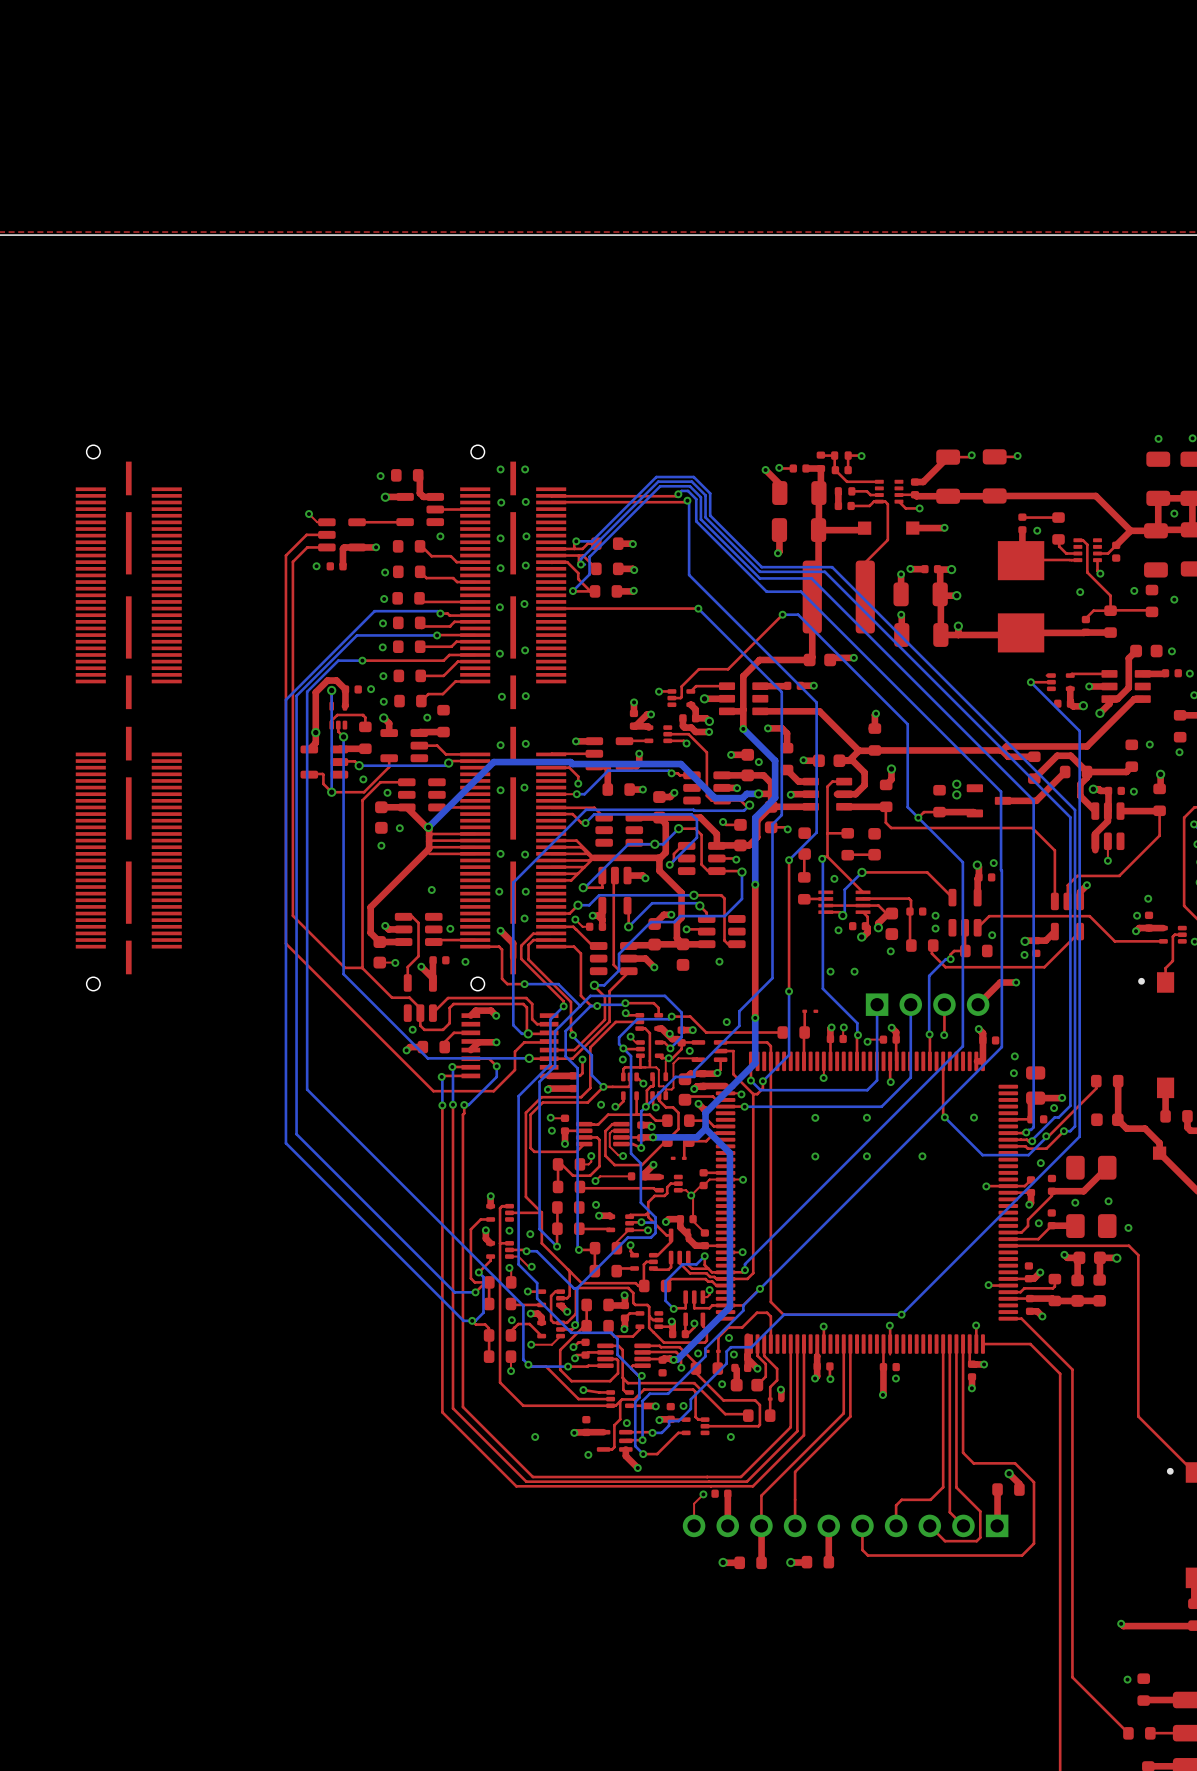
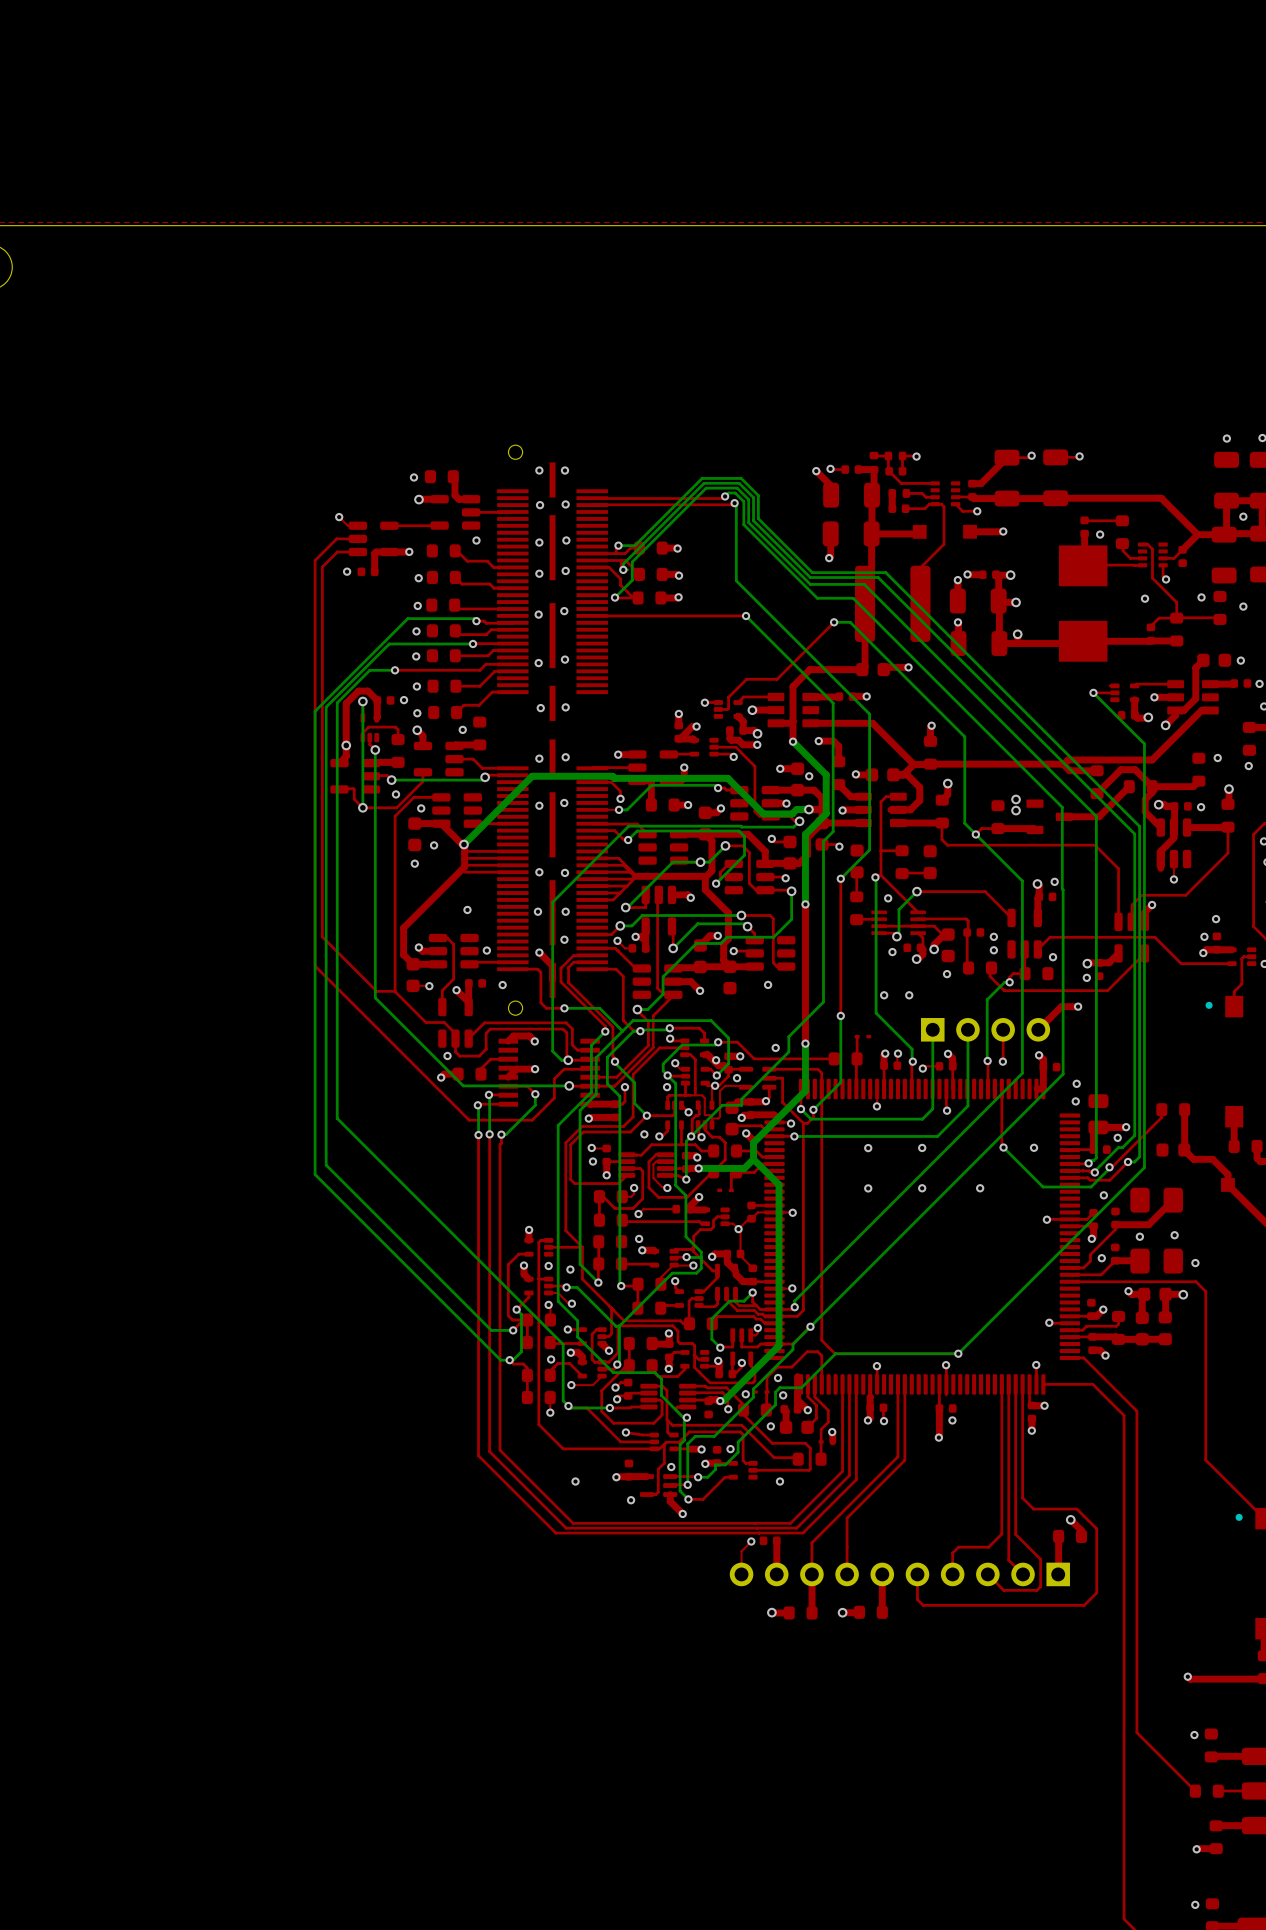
part: (128, 717) -> none

